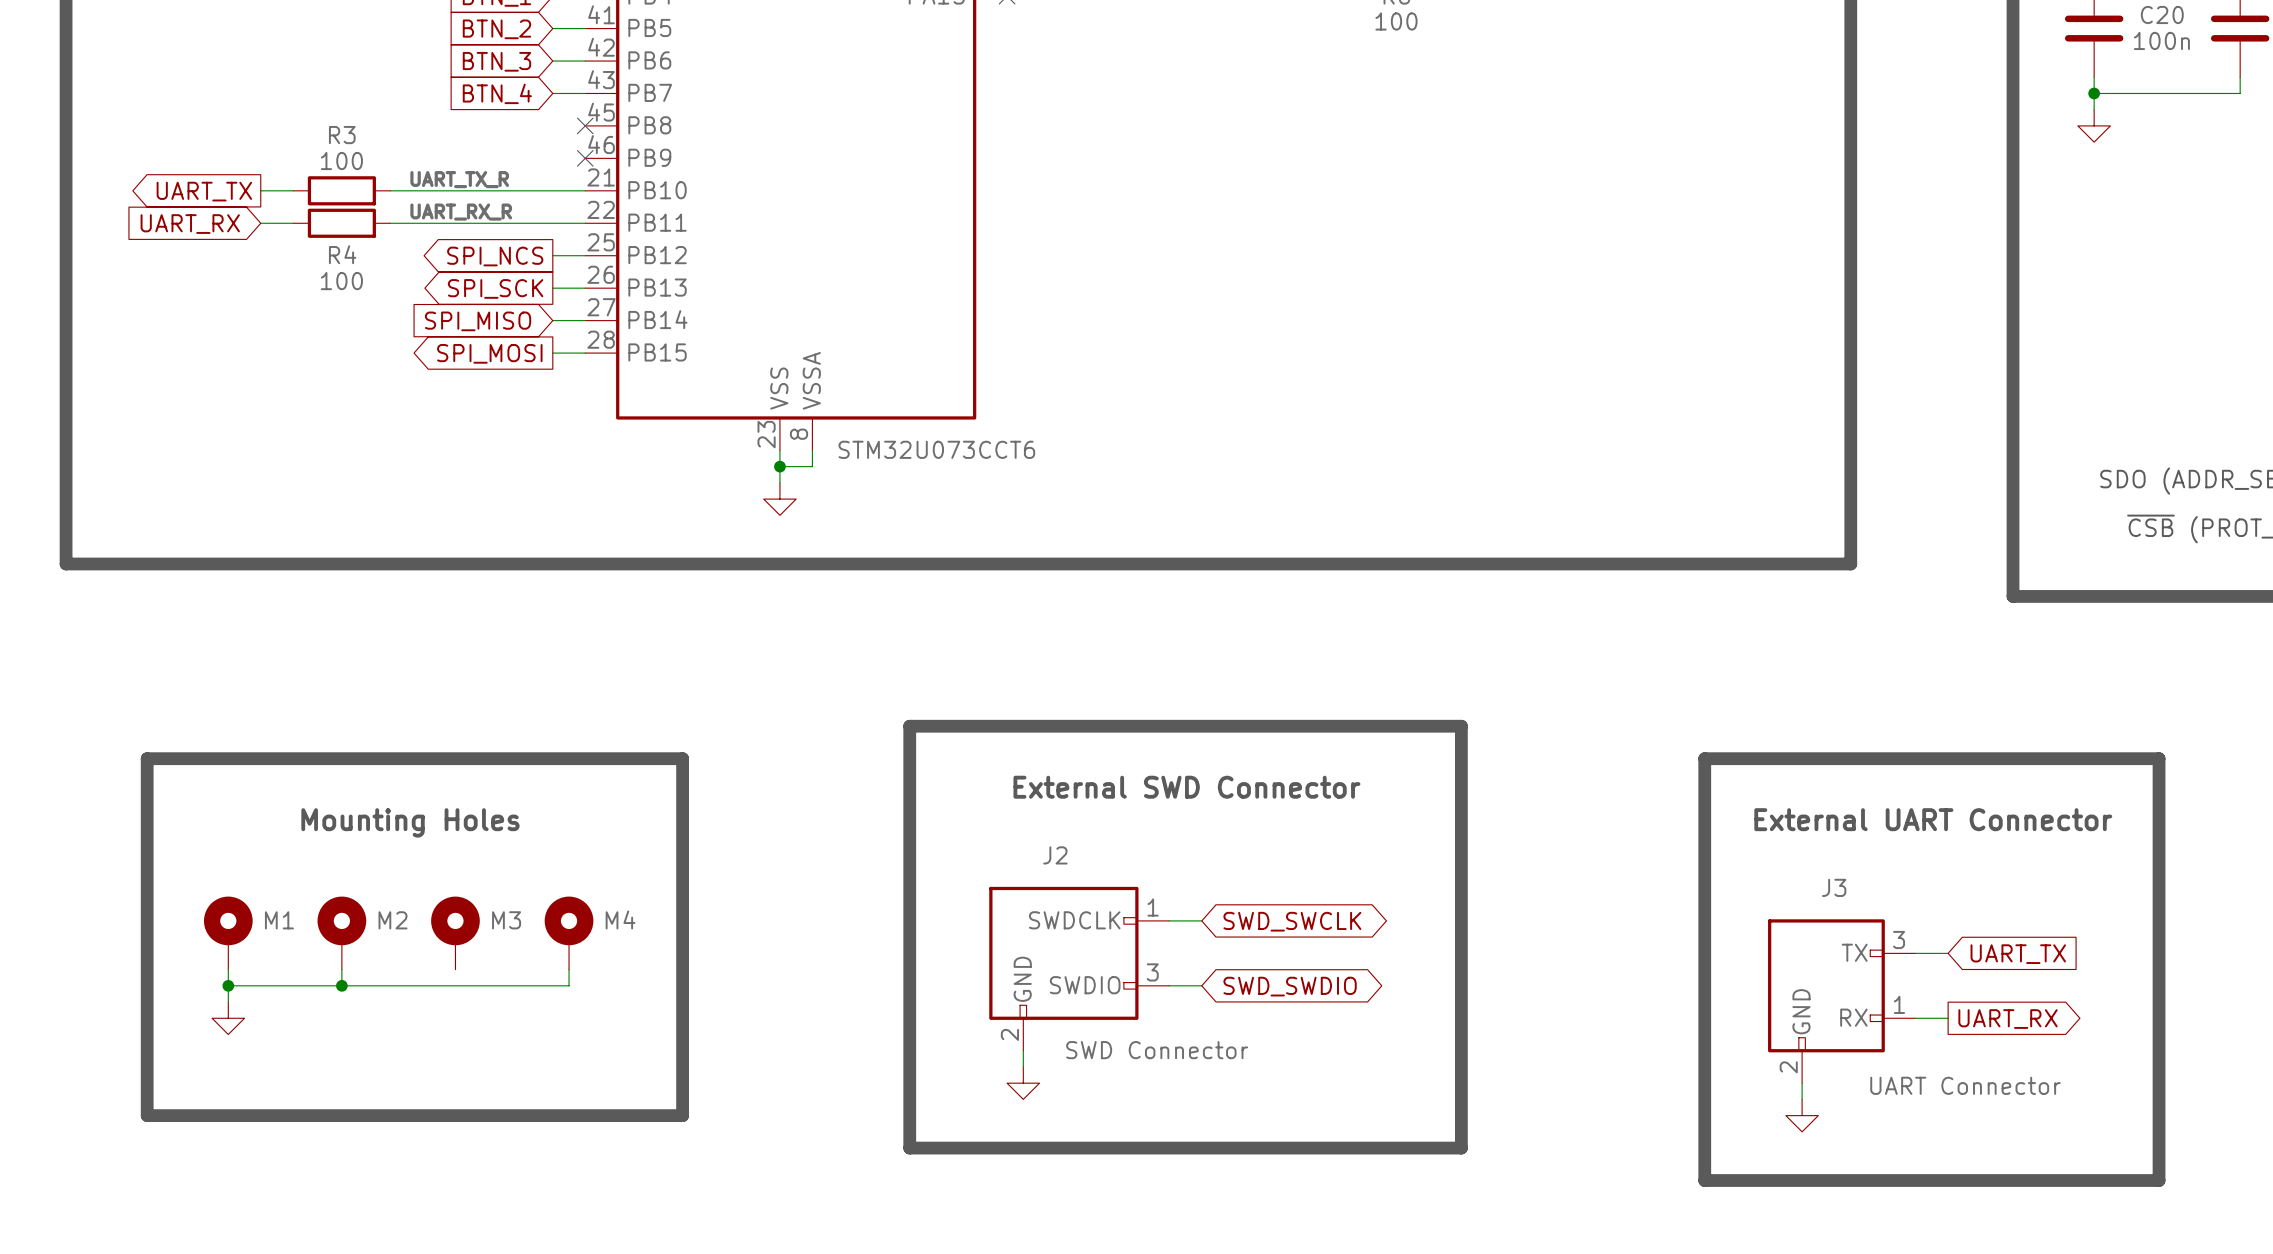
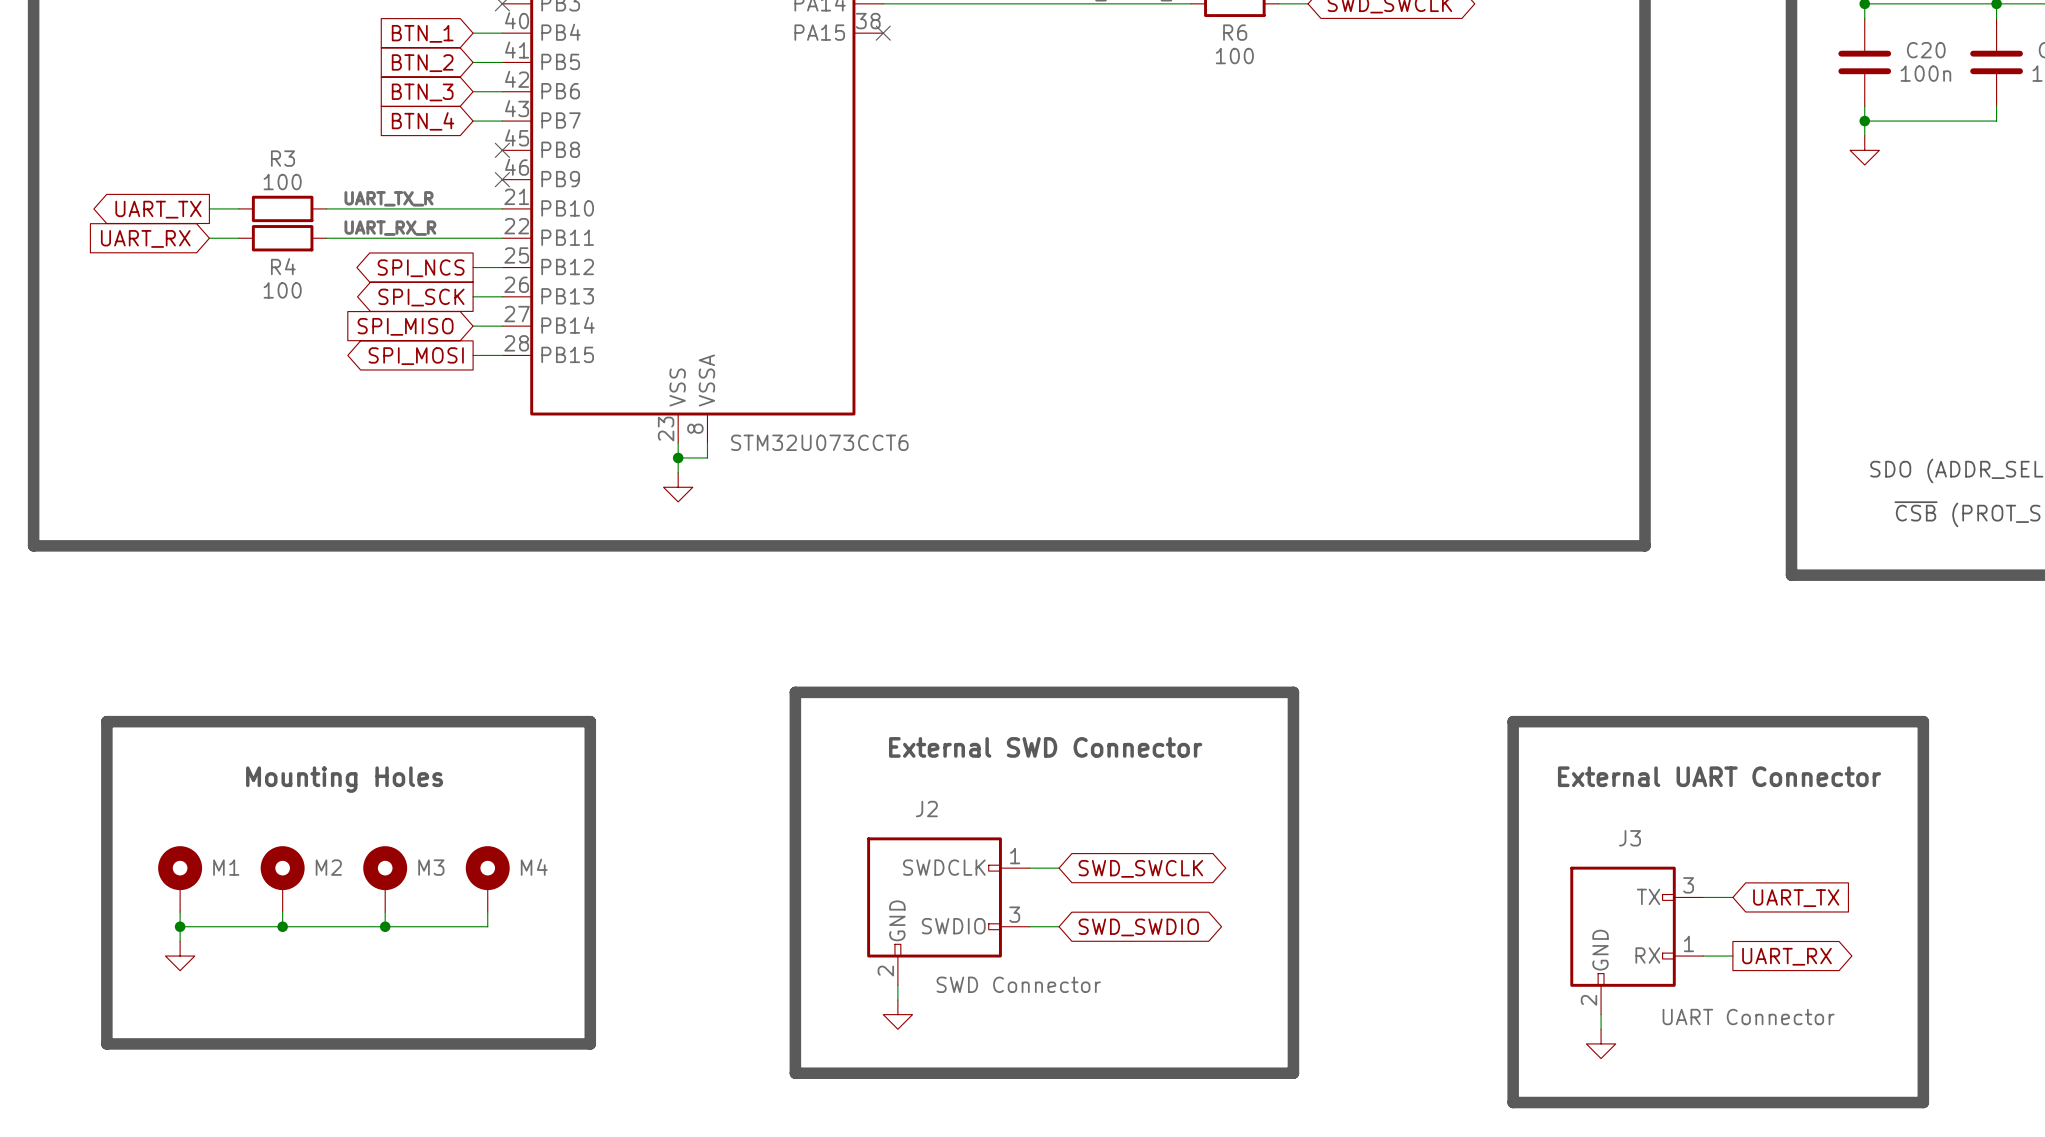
wire: none -> (385, 912) (385, 926)
junction: none -> (385, 926)

